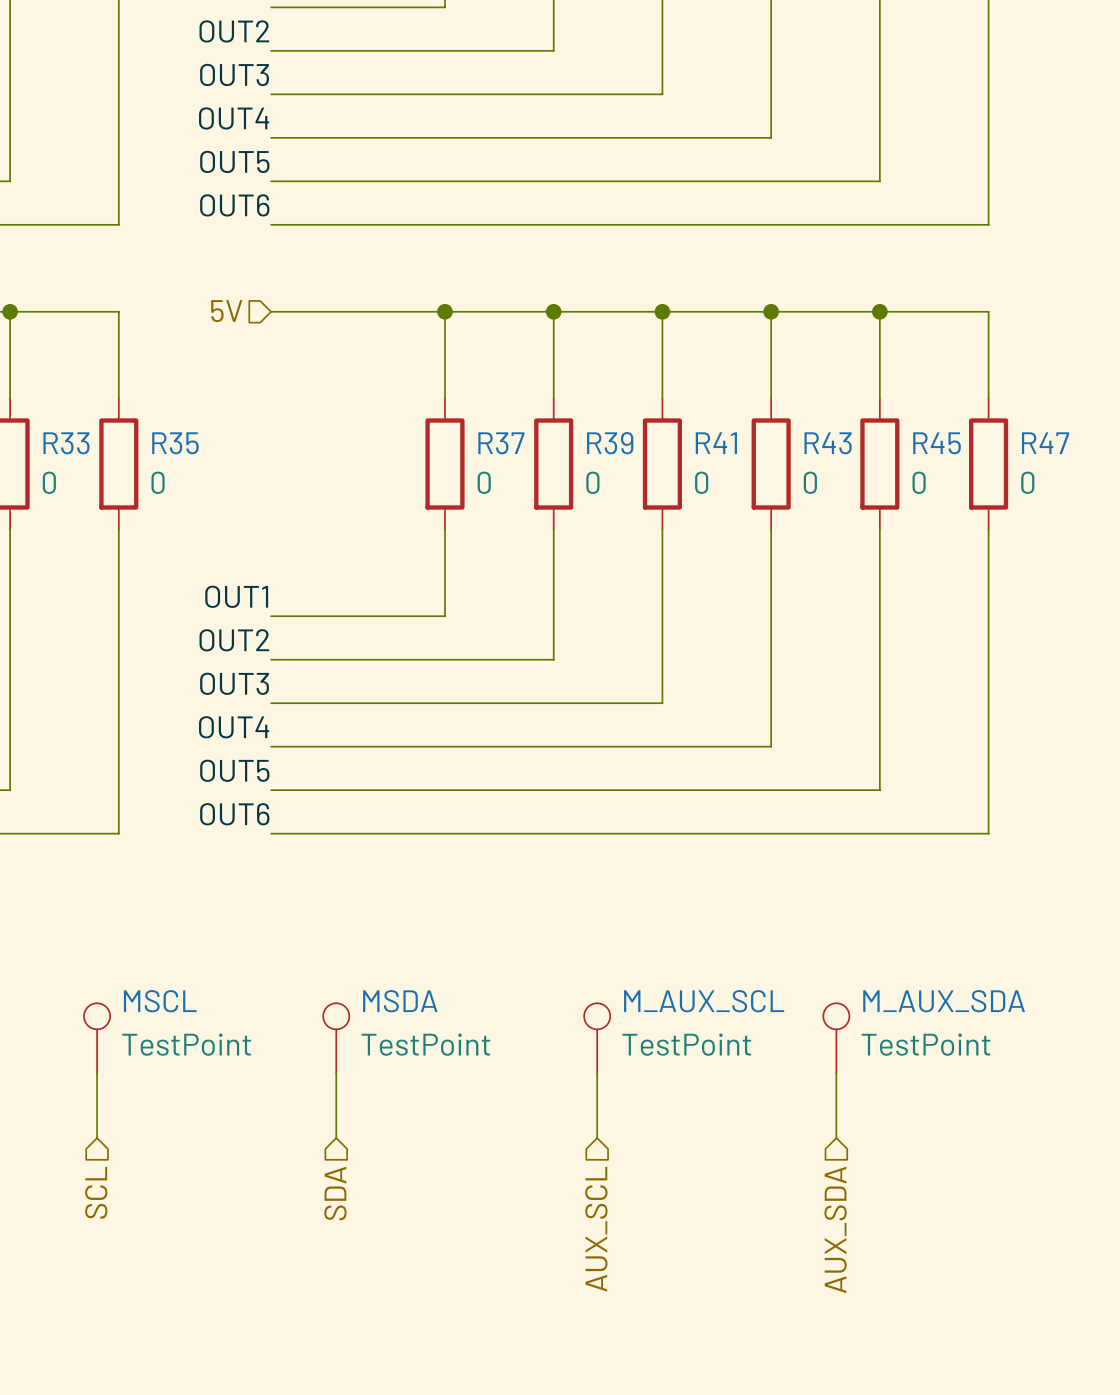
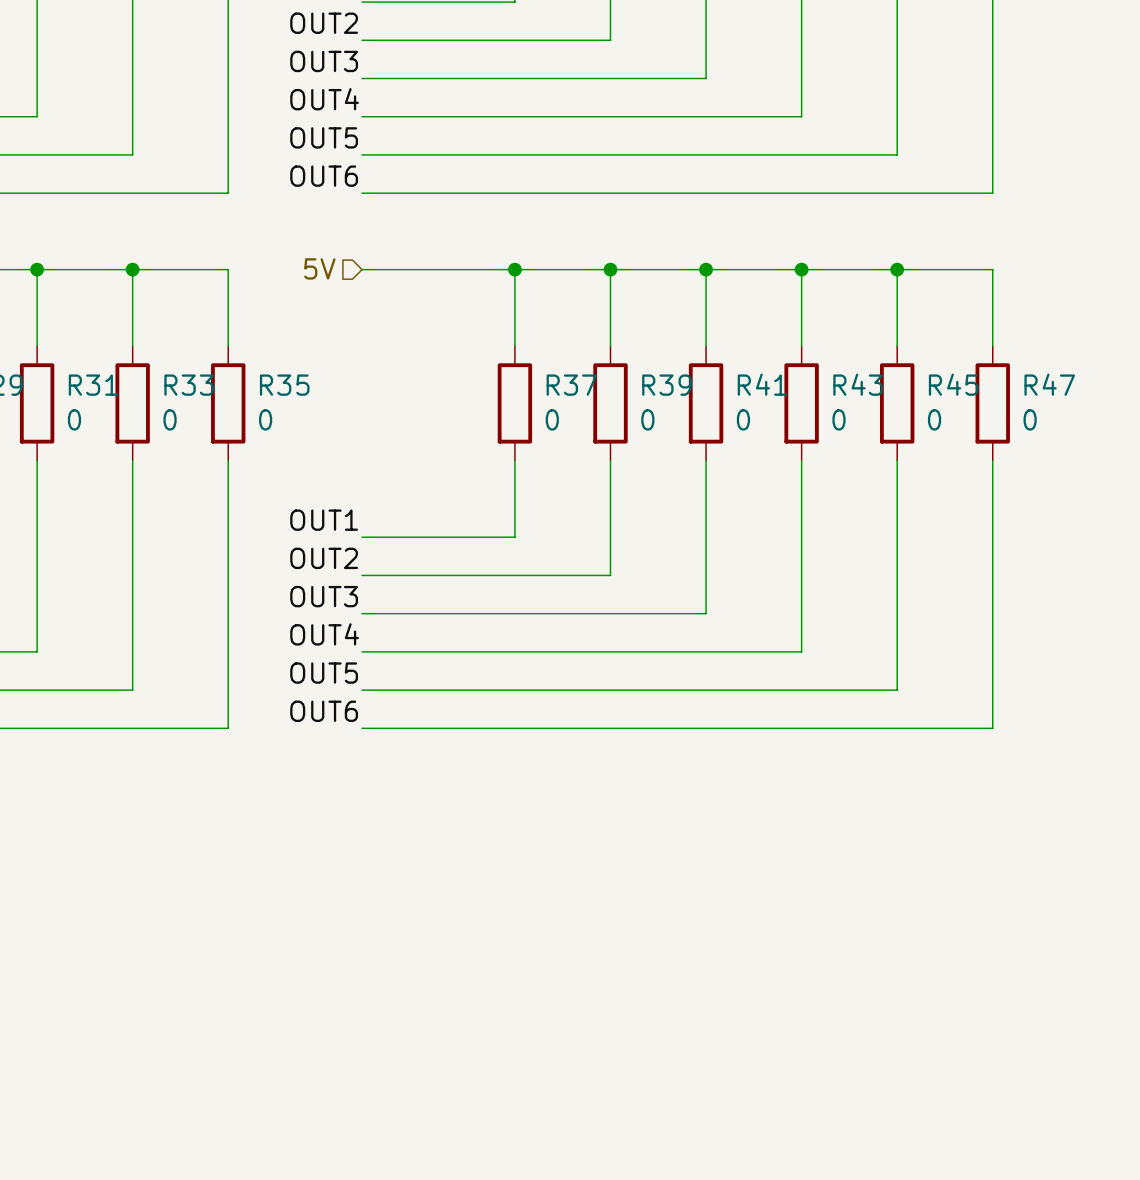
MSCL: TestPoint (97, 1038) -> none
MSDA: TestPoint (336, 1038) -> none
M_AUX_SCL: TestPoint (597, 1038) -> none
M_AUX_SDA: TestPoint (836, 1038) -> none
wire: (97, 1072) (97, 1138) -> none
wire: (336, 1072) (336, 1138) -> none
wire: (597, 1072) (597, 1138) -> none
wire: (836, 1072) (836, 1138) -> none
hierarchical label: SCL (96, 1192) -> none
hierarchical label: SDA (335, 1193) -> none
hierarchical label: AUX_SCL (596, 1229) -> none
hierarchical label: AUX_SDA (835, 1229) -> none

